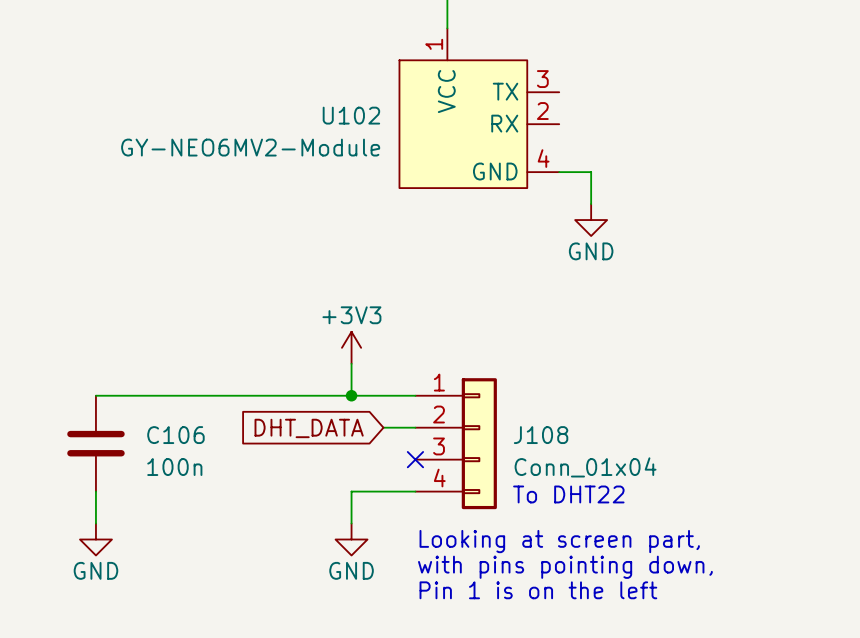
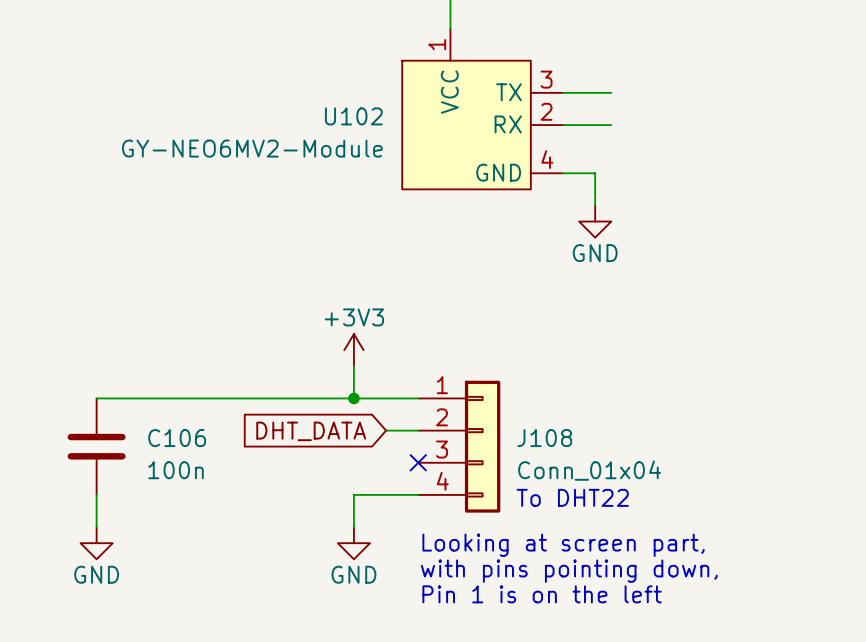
wire: none -> (563, 92) (611, 92)
wire: none -> (563, 125) (611, 125)

